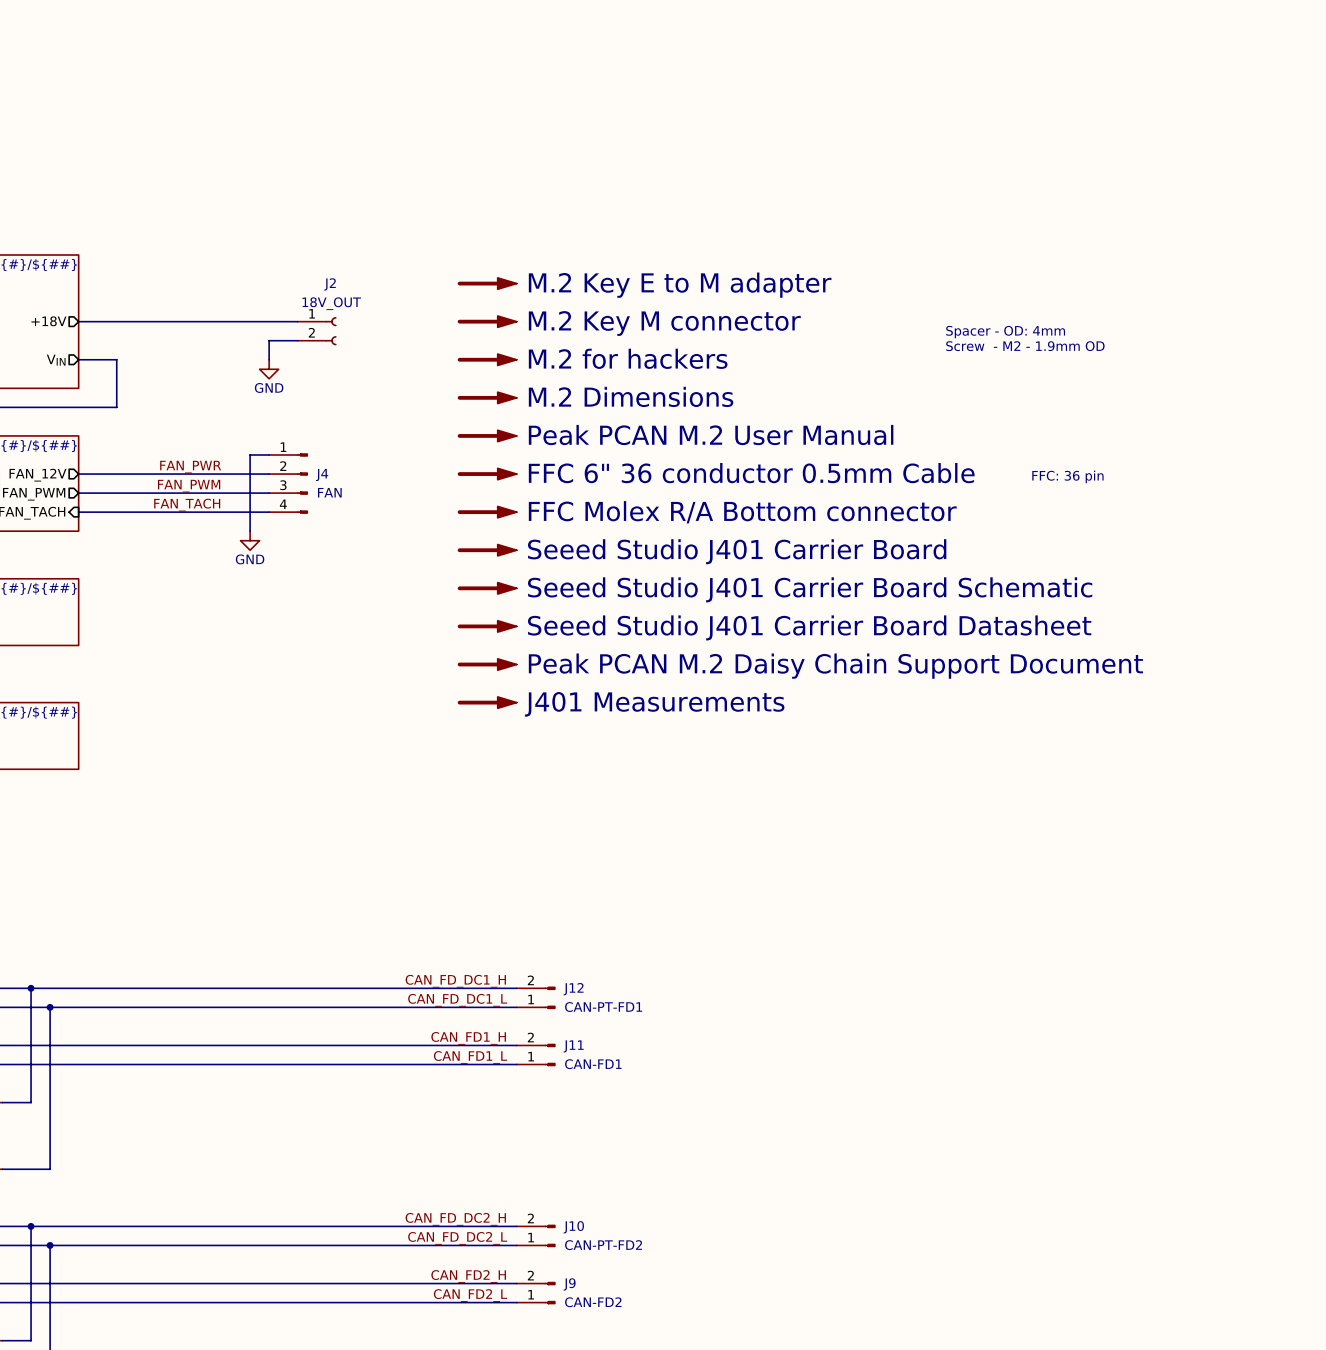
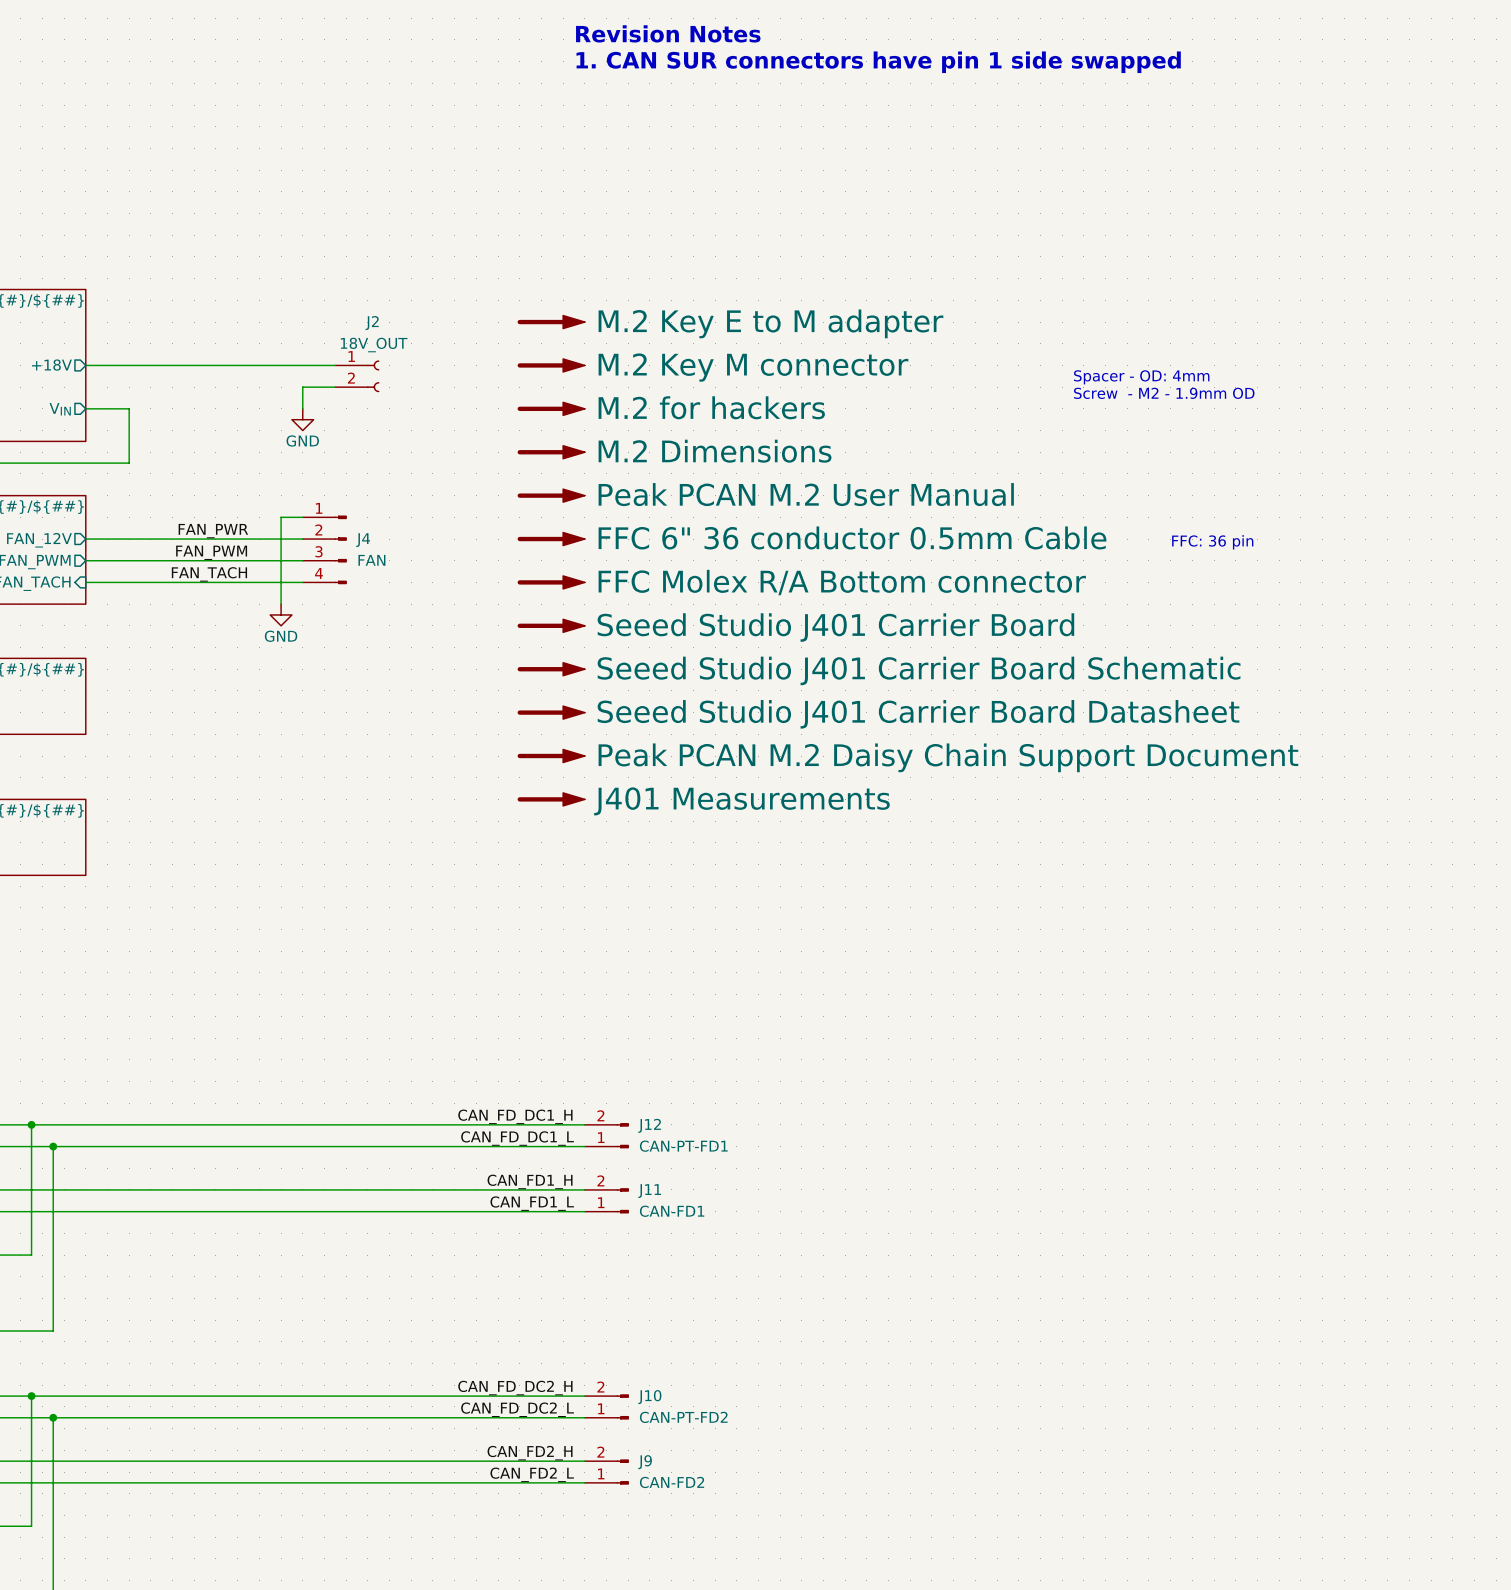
text: none -> Revision Notes (668, 33)
text: none -> 1. CAN SUR connectors have pin 1 side swapped (878, 62)

